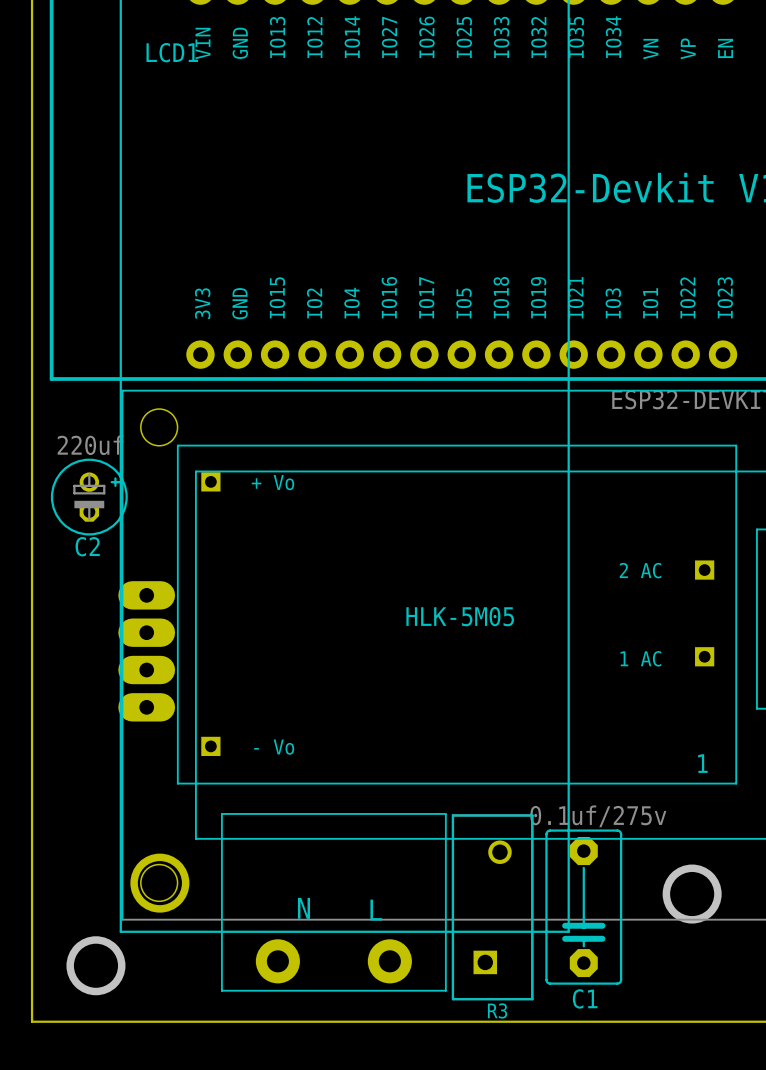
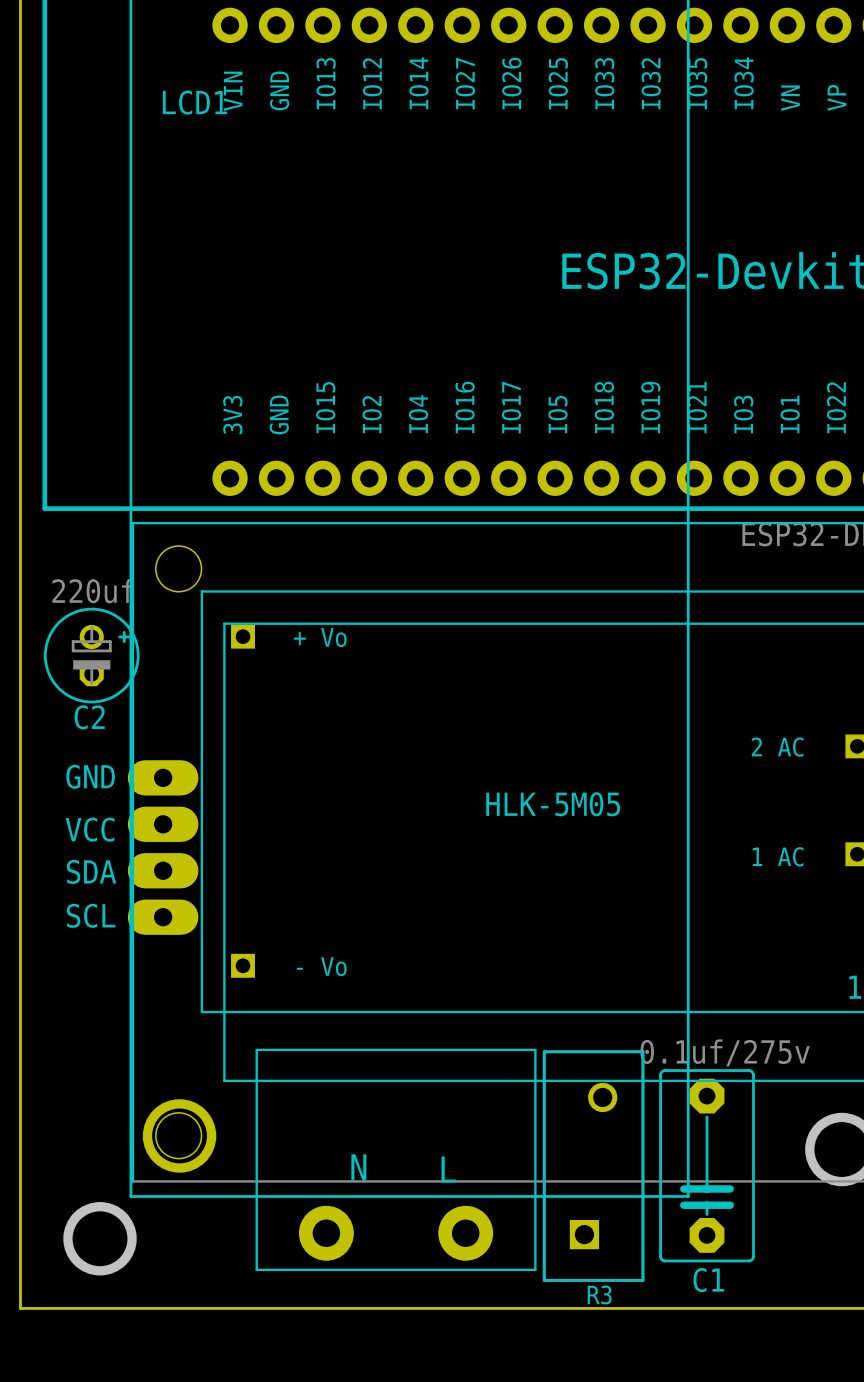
text: none -> GND (90, 776)
text: none -> VCC (90, 829)
text: none -> SDA (91, 871)
text: none -> SCL (91, 915)

